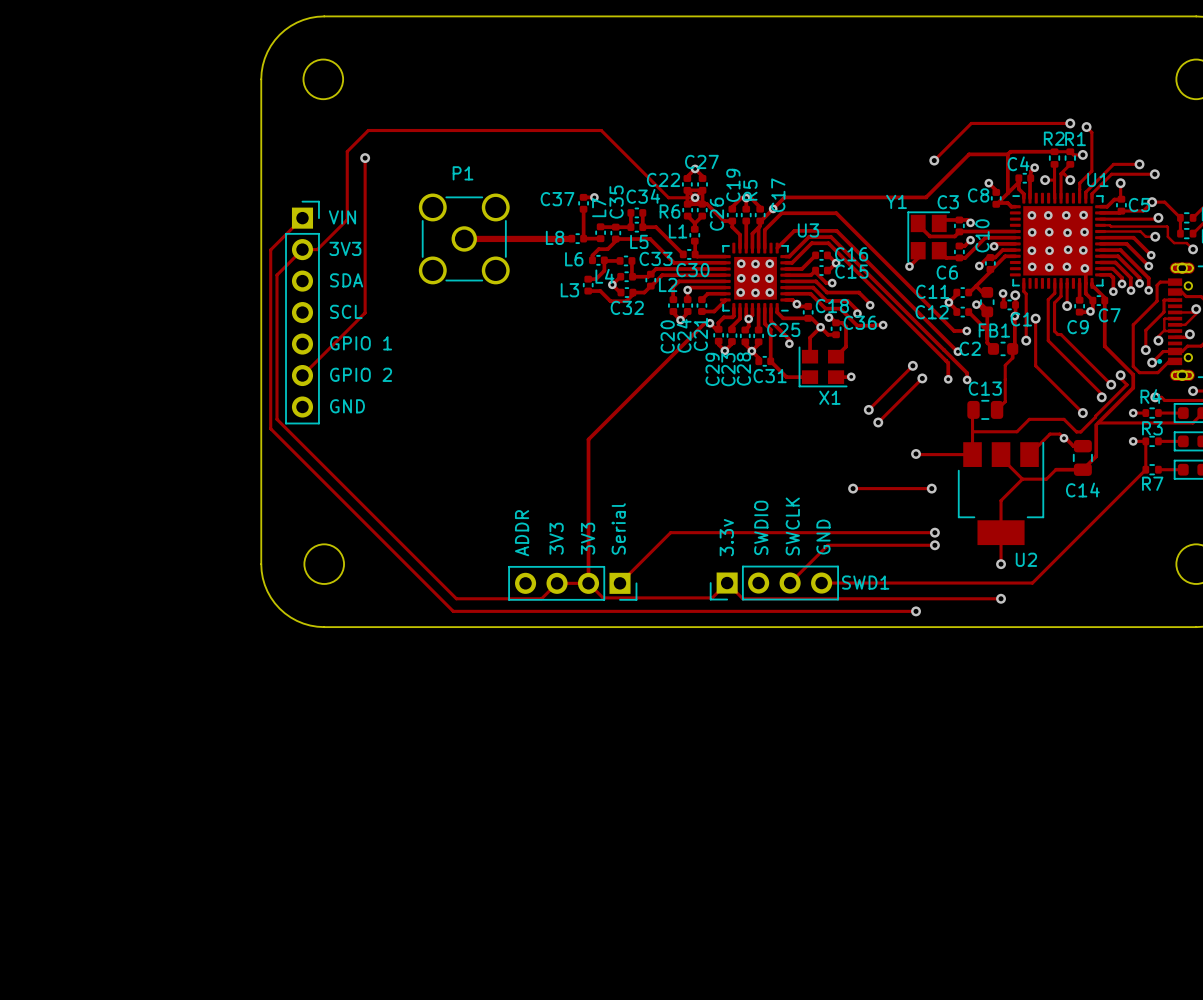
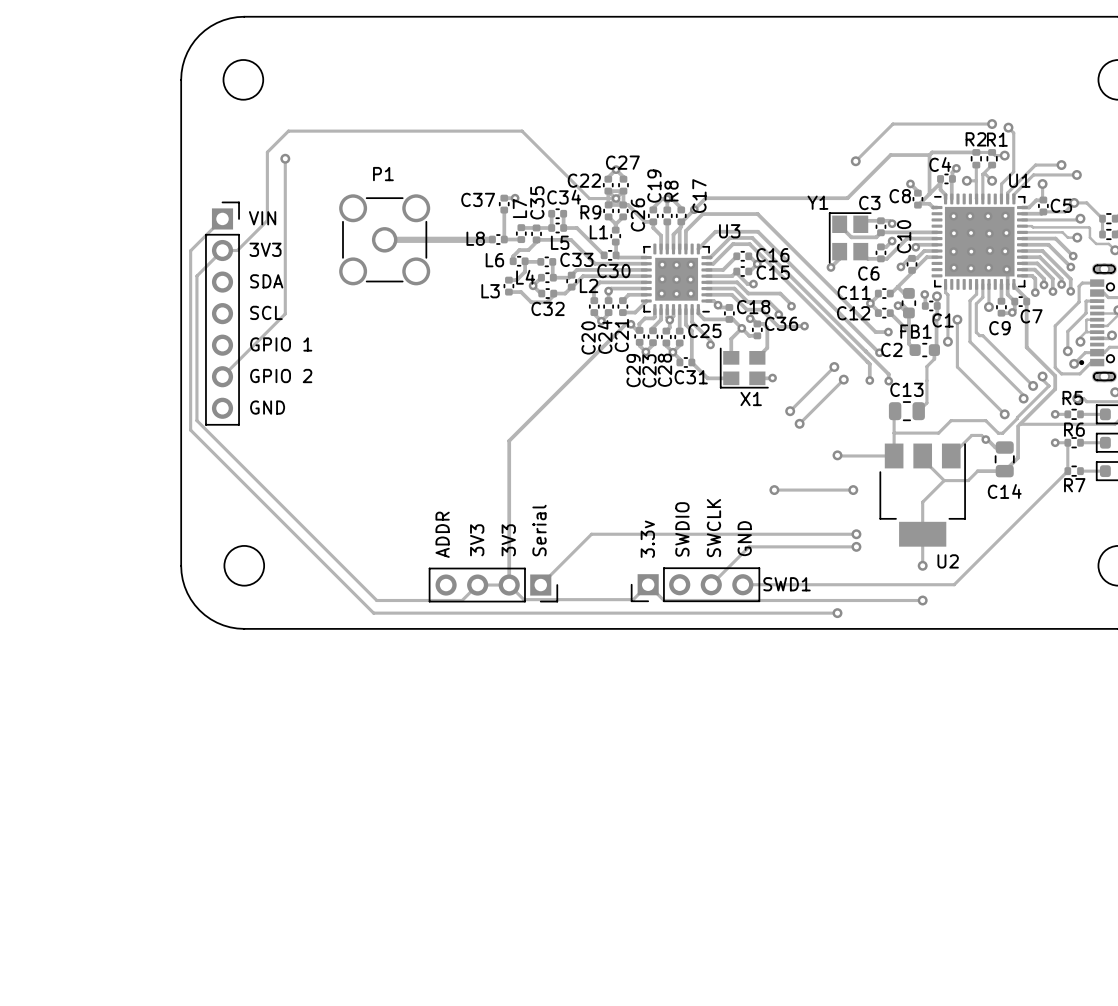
R5 name: R5 (750, 190) -> R8 (671, 191)
R6 name: R6 (669, 211) -> R9 (590, 212)
R4 name: R4 (1151, 396) -> R5 (1072, 398)
R3 name: R3 (1152, 428) -> R6 (1074, 429)

